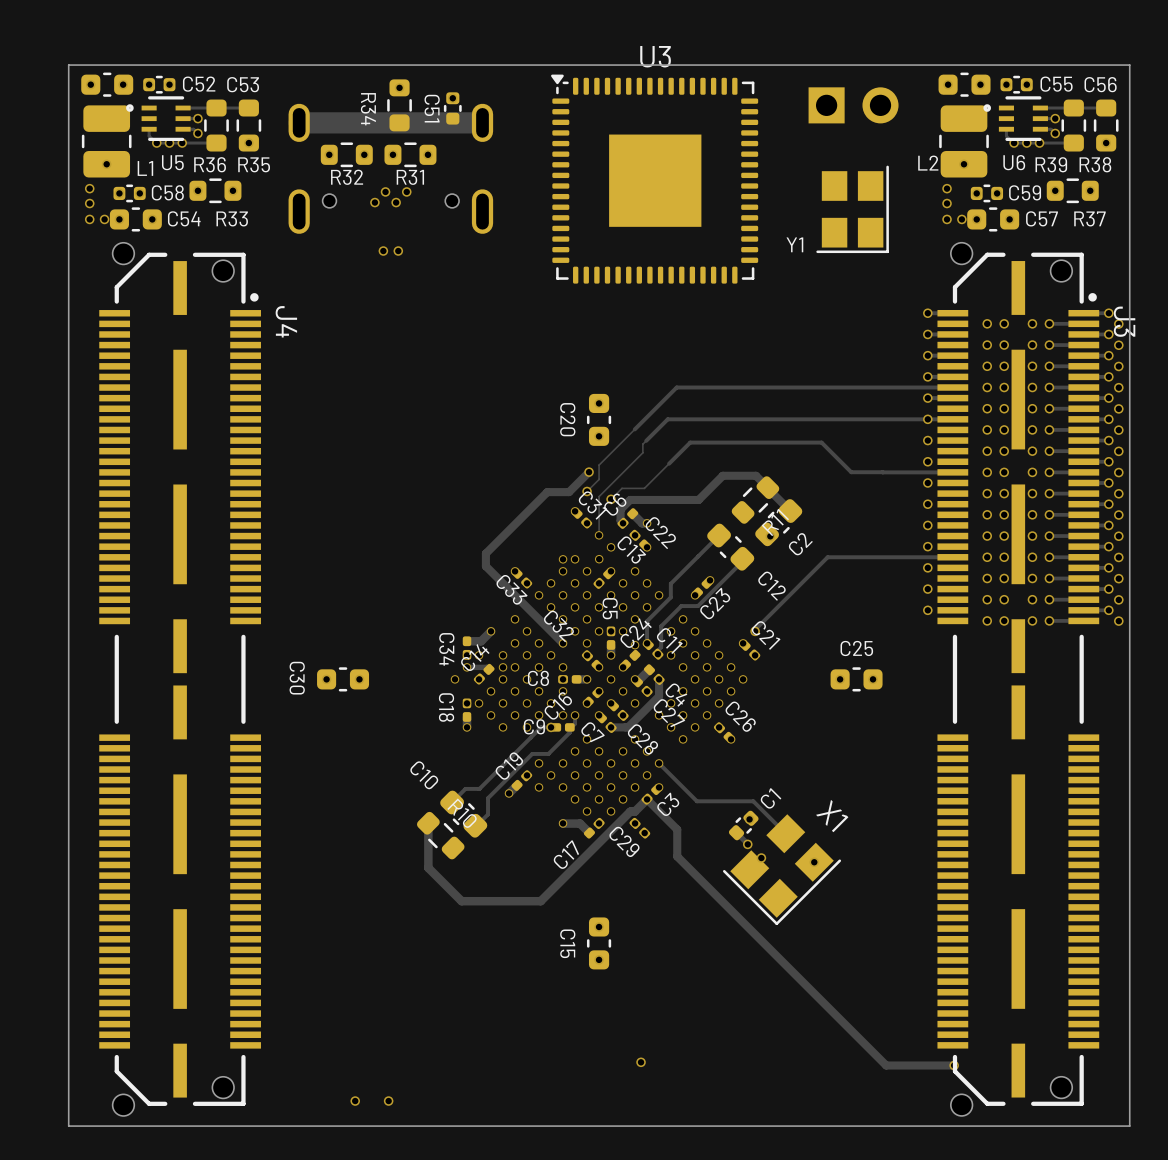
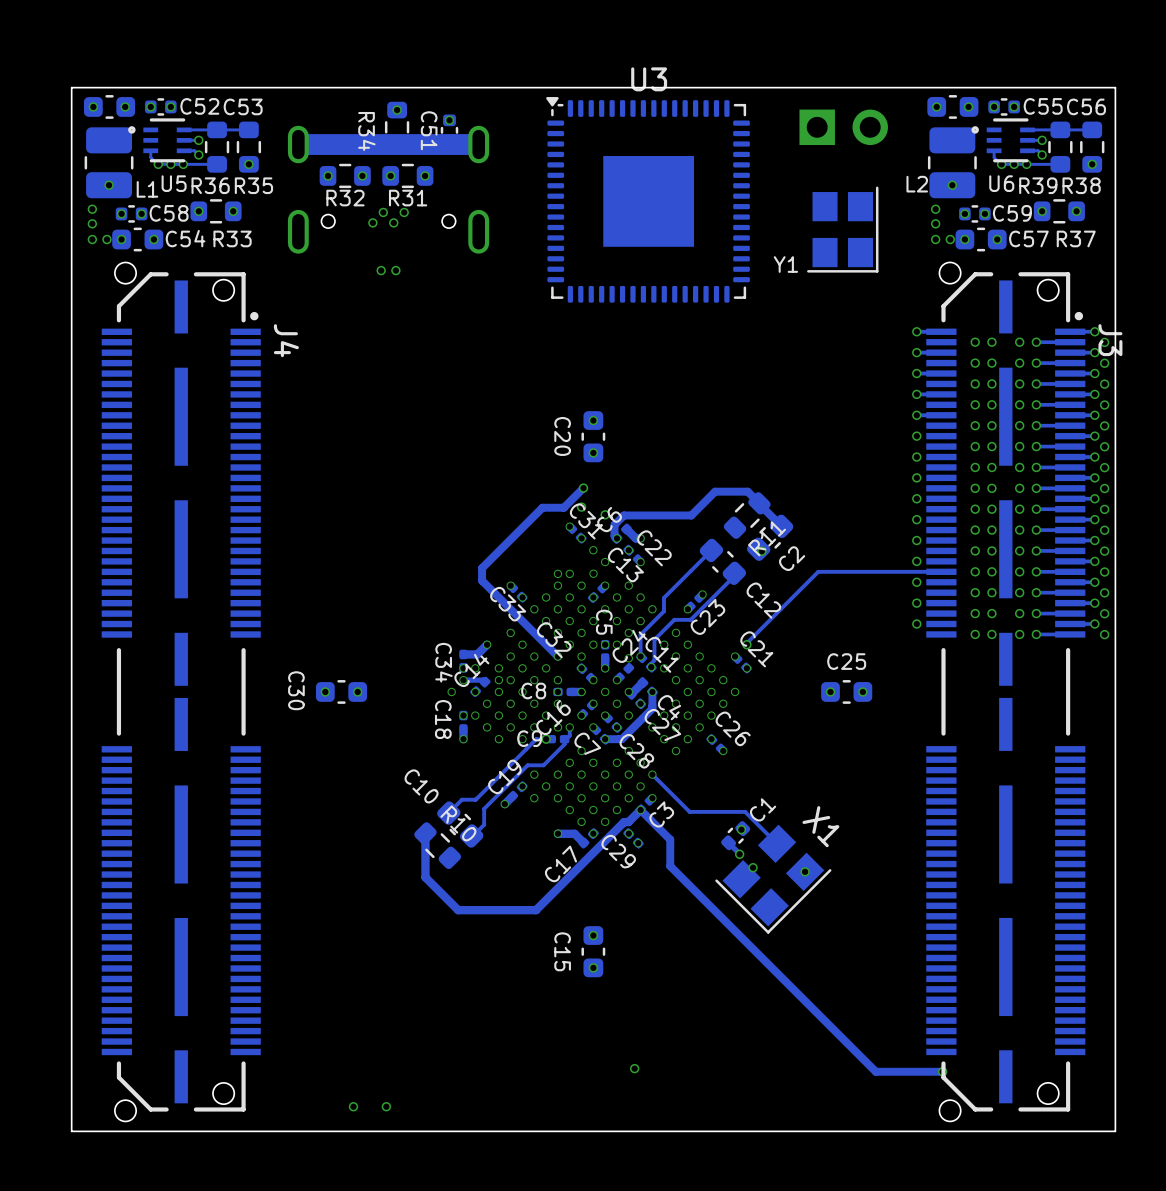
track: (952, 387) (676, 387) (599, 465) (599, 479) (587, 491) -> none
track: (952, 419) (667, 419) (642, 444) (642, 452) (599, 496) (599, 535) -> none
track: (882, 472) (851, 472) (821, 442) (690, 442) (644, 488) (621, 488) (611, 499) -> none
track: (952, 472) (882, 472) -> none

